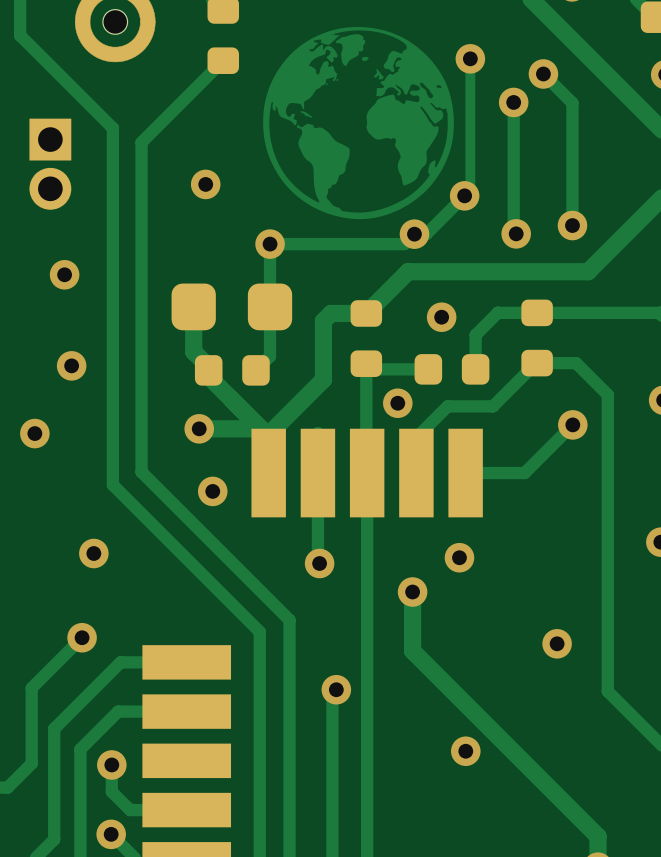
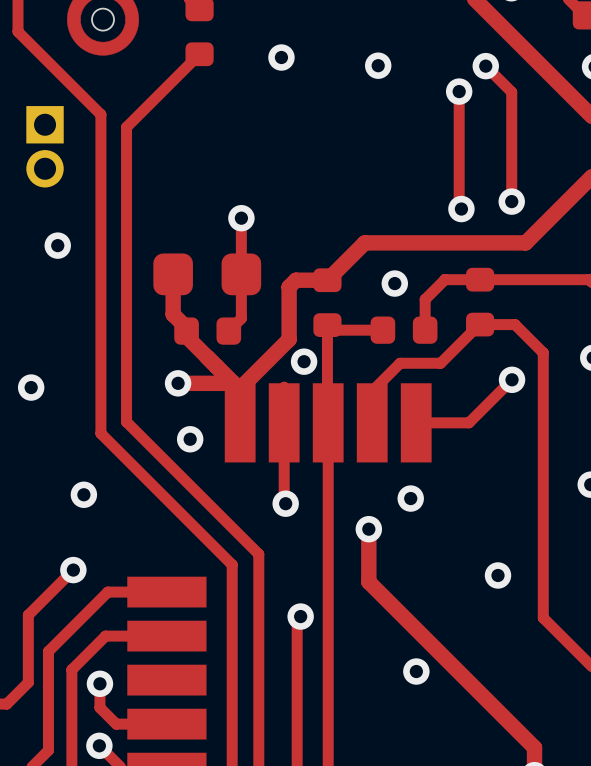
drawing: [263, 26, 454, 220] -> none
track: (470, 58) (470, 190) (426, 234) (414, 234) (404, 244) (270, 244) -> none
via position: (470, 58) -> (378, 65)
via: none -> (281, 57)
via: (205, 184) -> none
via: (464, 195) -> none
via: (414, 234) -> none
via: (71, 365) -> none
via position: (397, 403) -> (304, 361)

